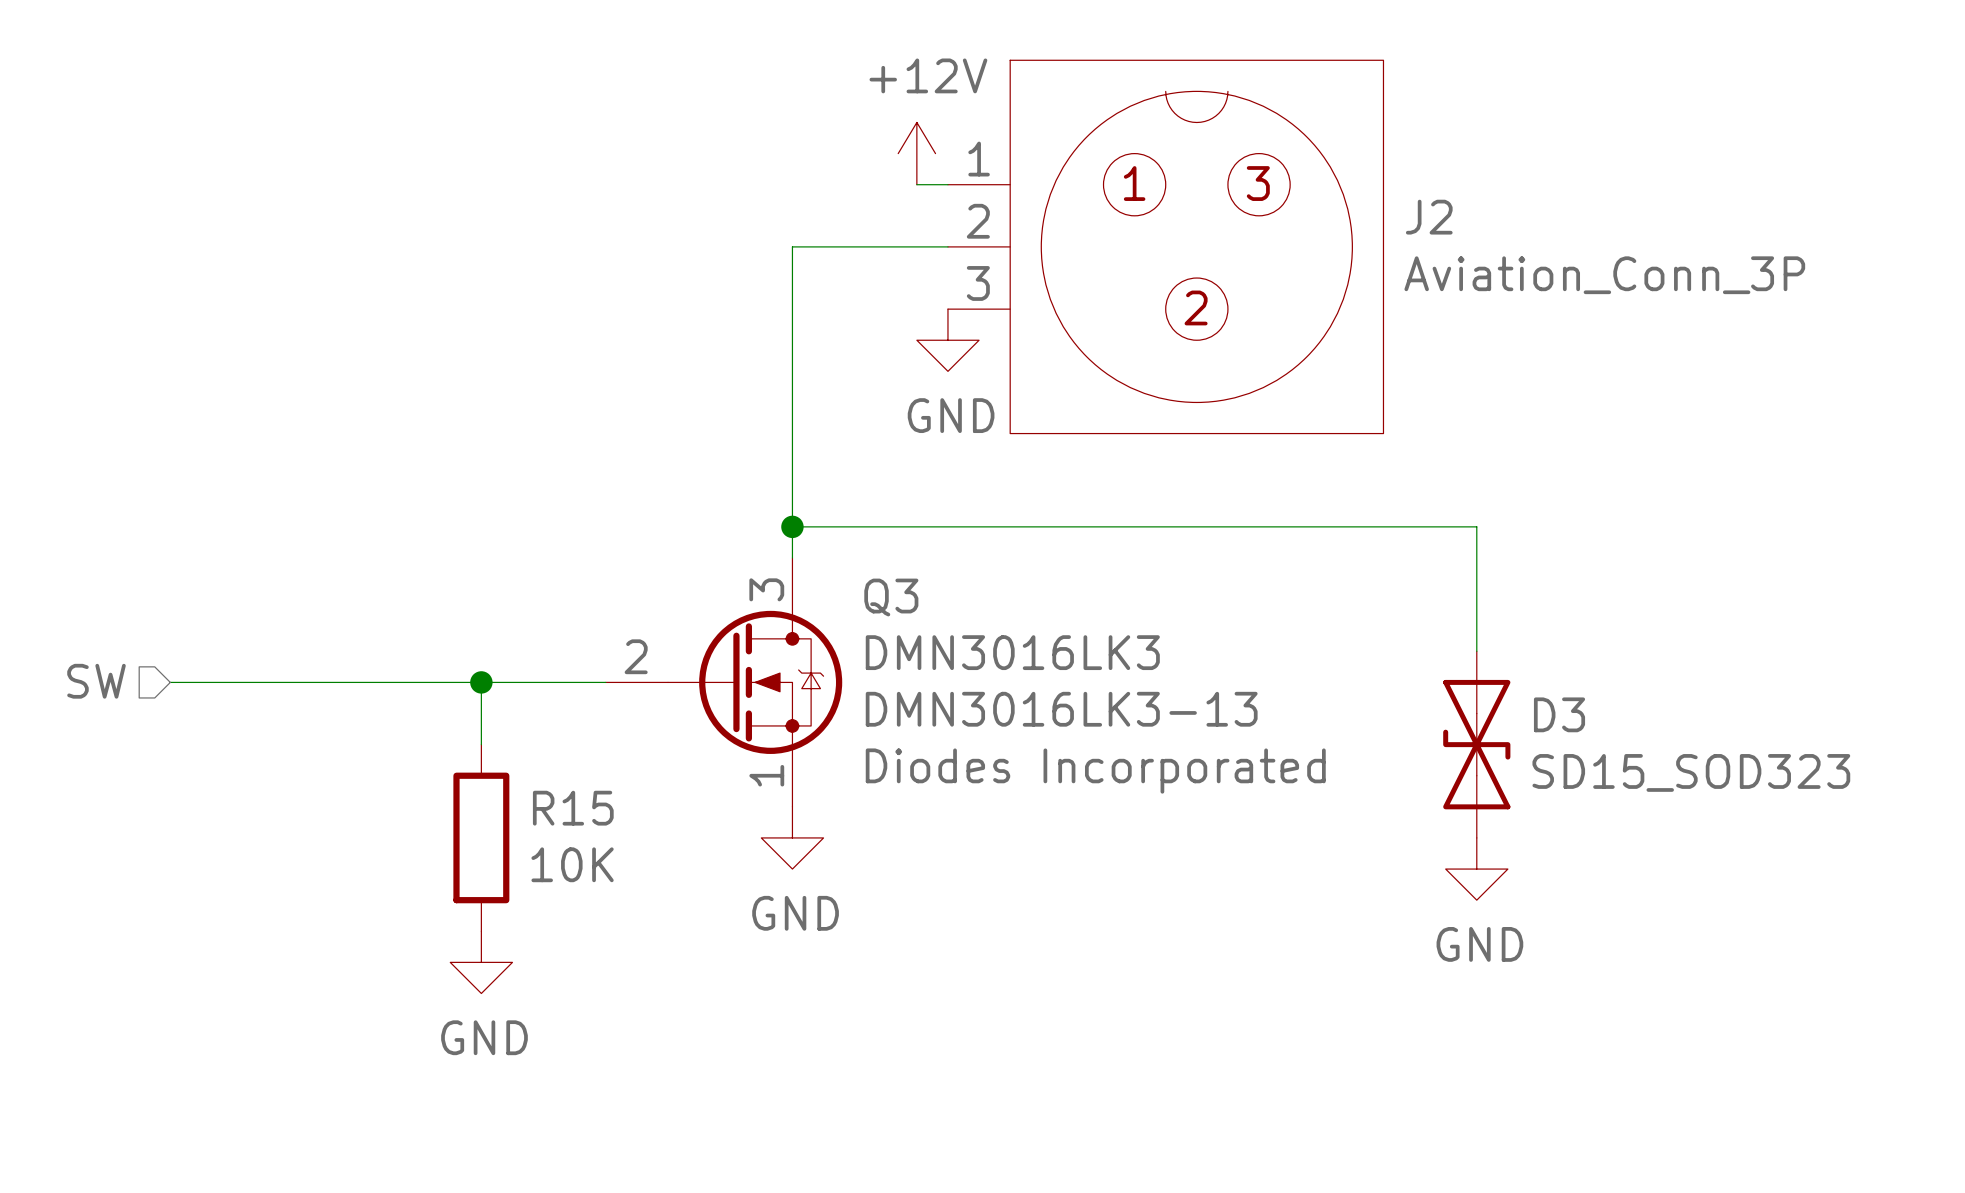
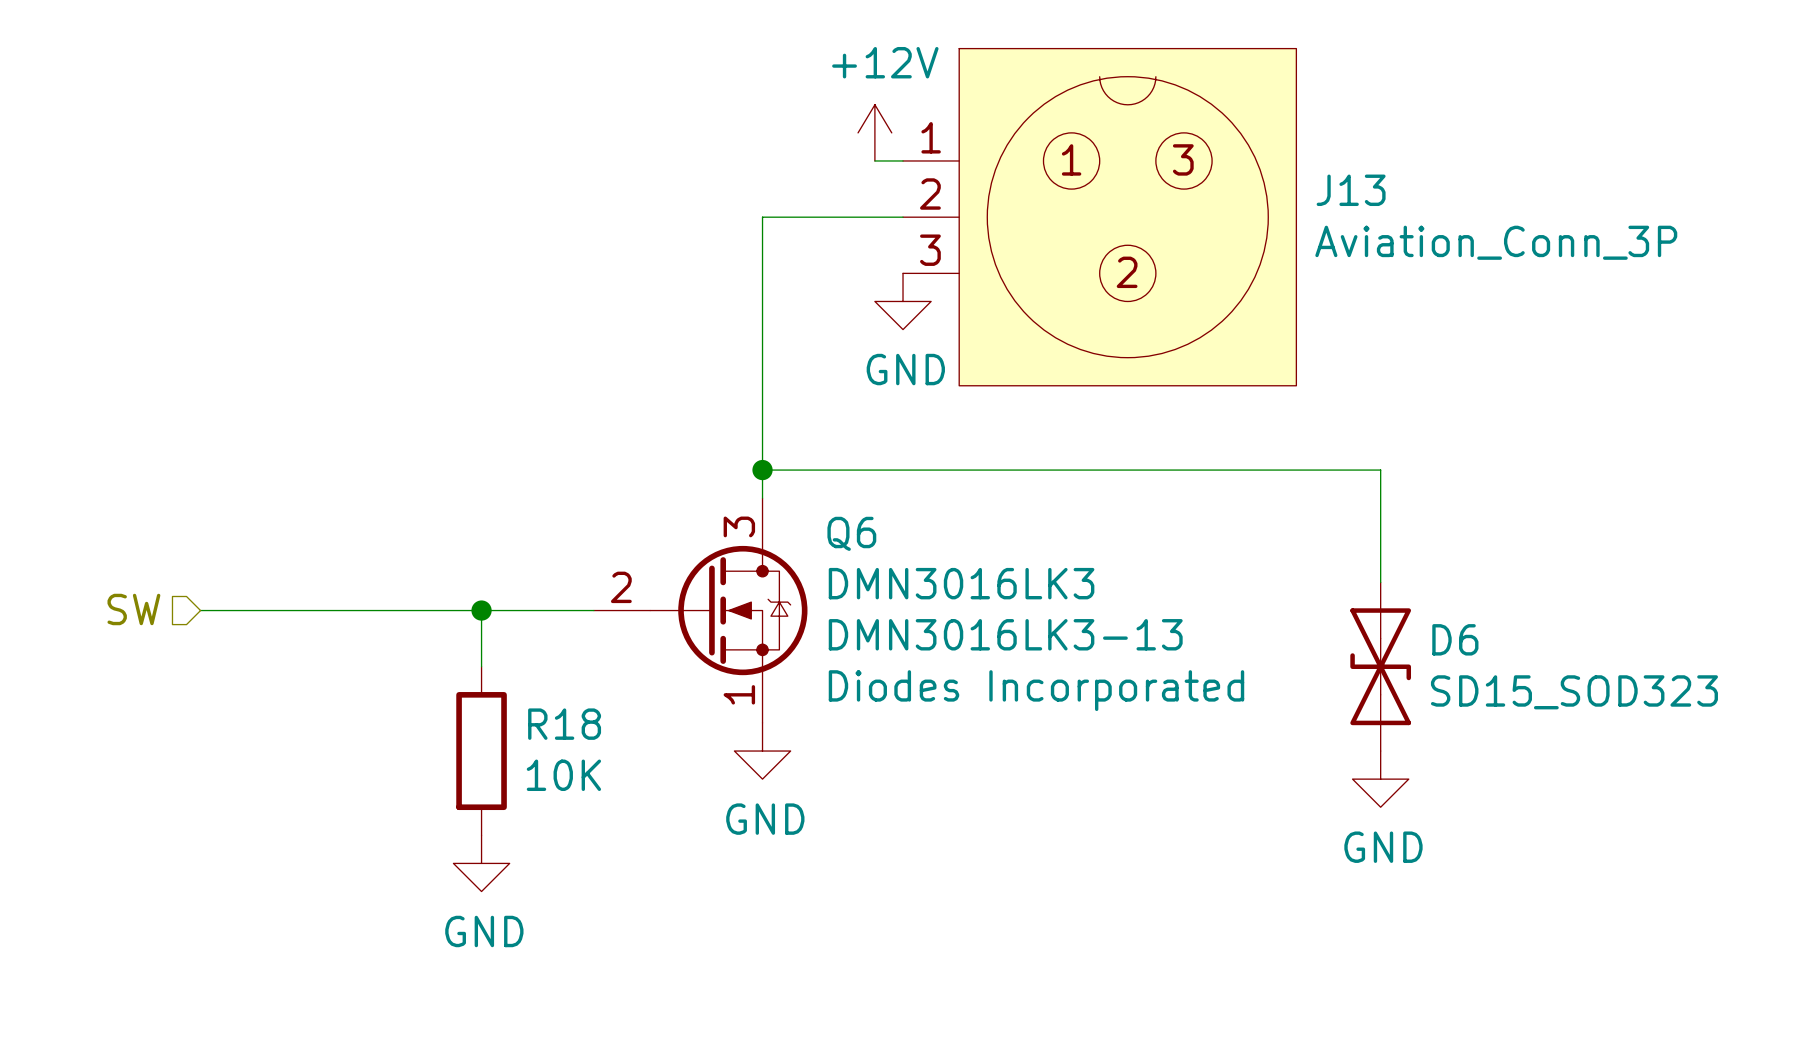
J2 name: J2 (1429, 217) -> J13 (1351, 190)
Q3 name: Q3 (891, 597) -> Q6 (851, 533)
D3 name: D3 (1559, 714) -> D6 (1455, 639)
R15 name: R15 (573, 808) -> R18 (564, 724)

